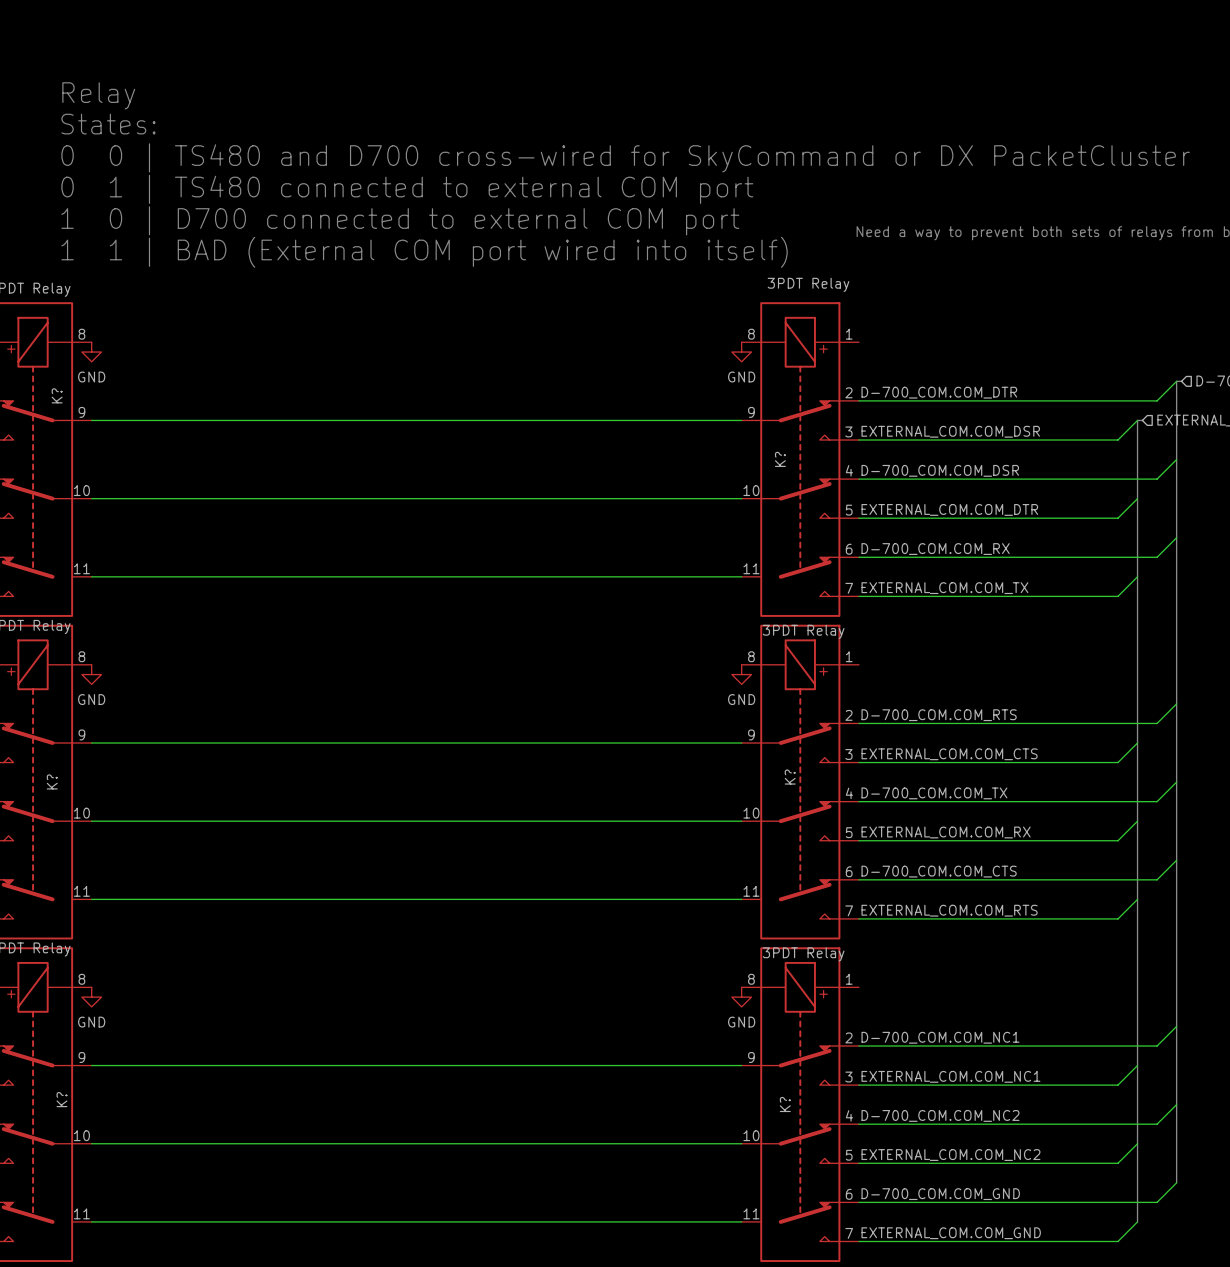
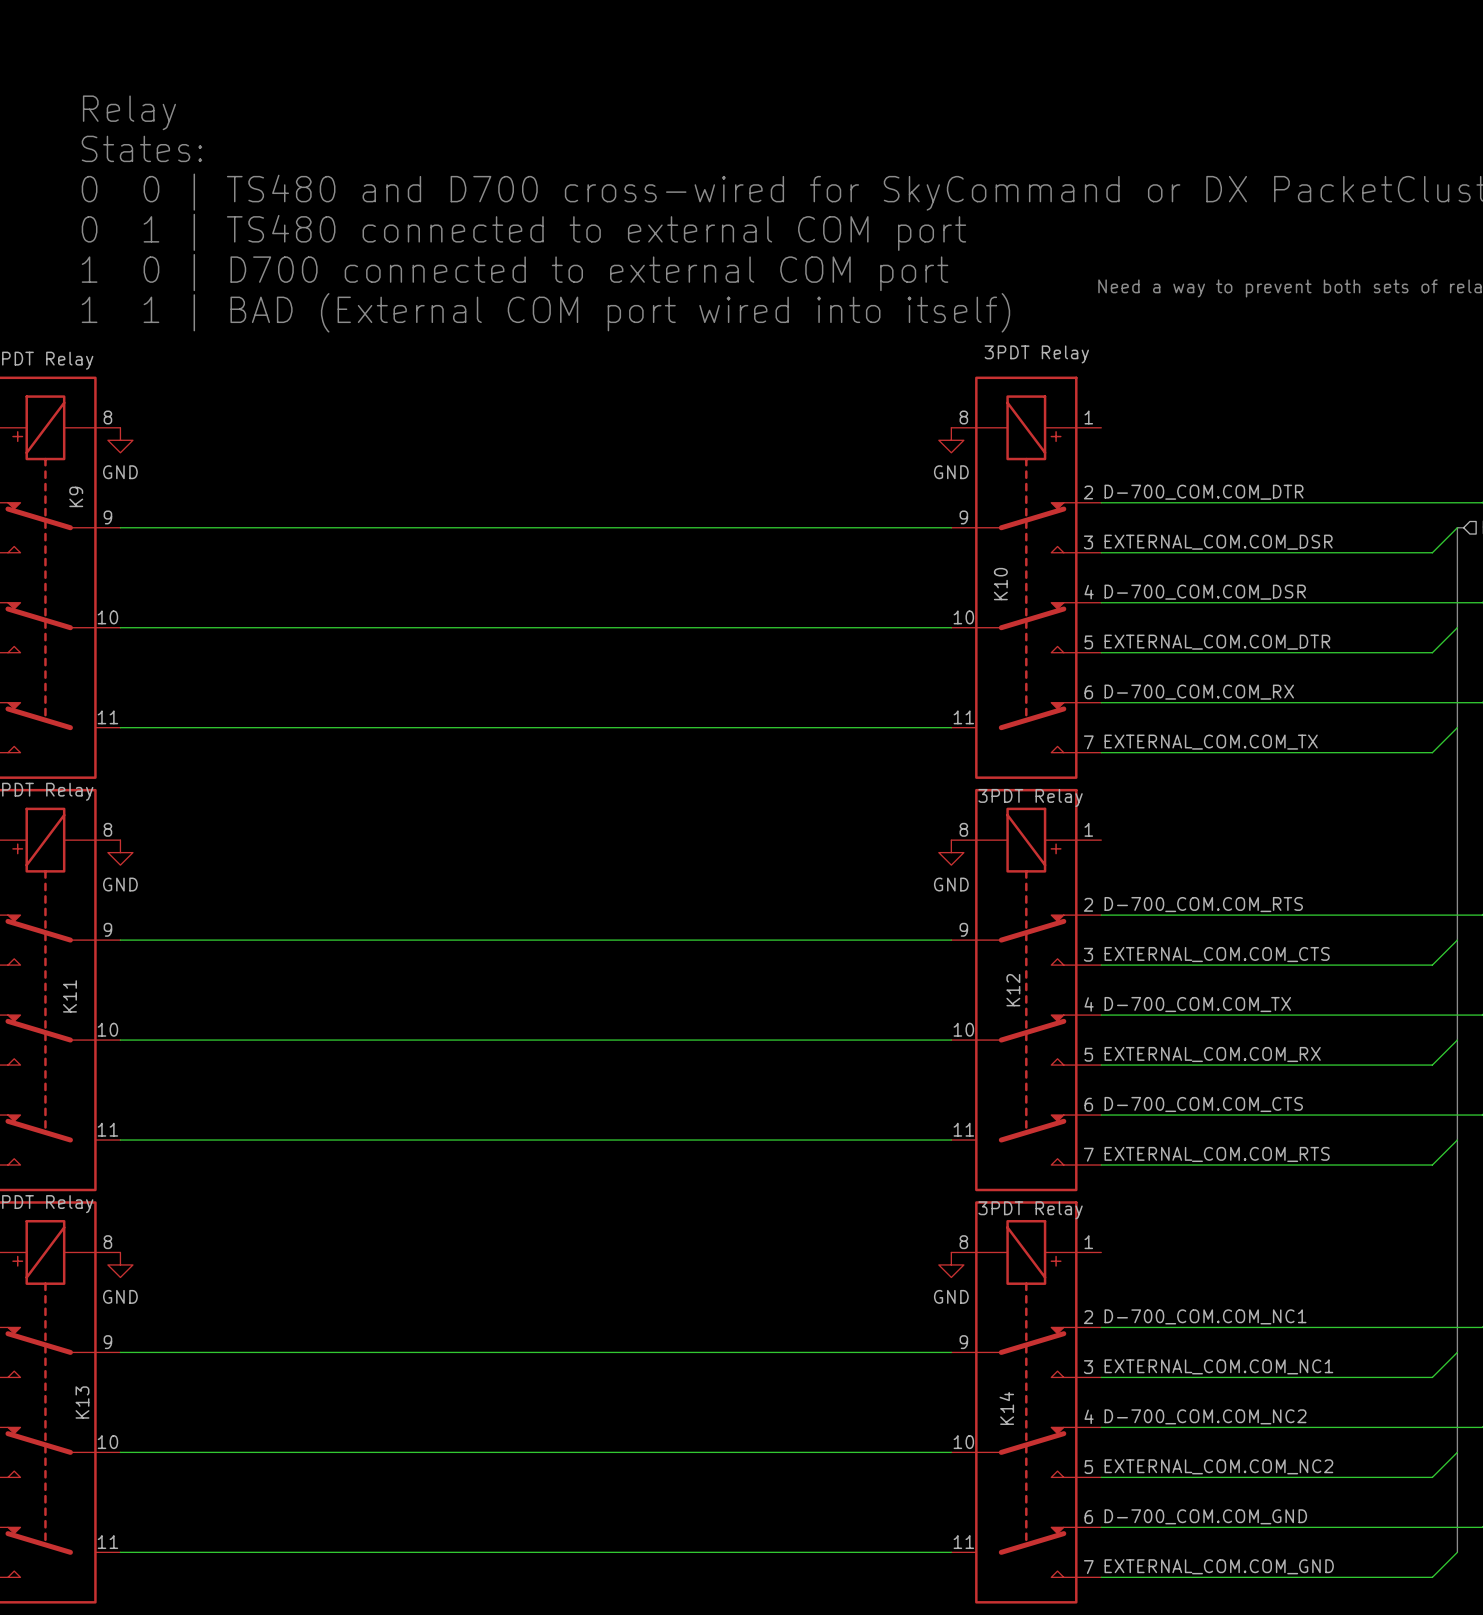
K? name: K? (57, 395) -> K9 (76, 496)
K? name: K? (780, 459) -> K10 (1000, 584)
K? name: K? (790, 777) -> K12 (1013, 990)
K? name: K? (52, 781) -> K11 (69, 996)
K? name: K? (62, 1099) -> K13 (82, 1402)
K? name: K? (785, 1104) -> K14 (1006, 1408)

